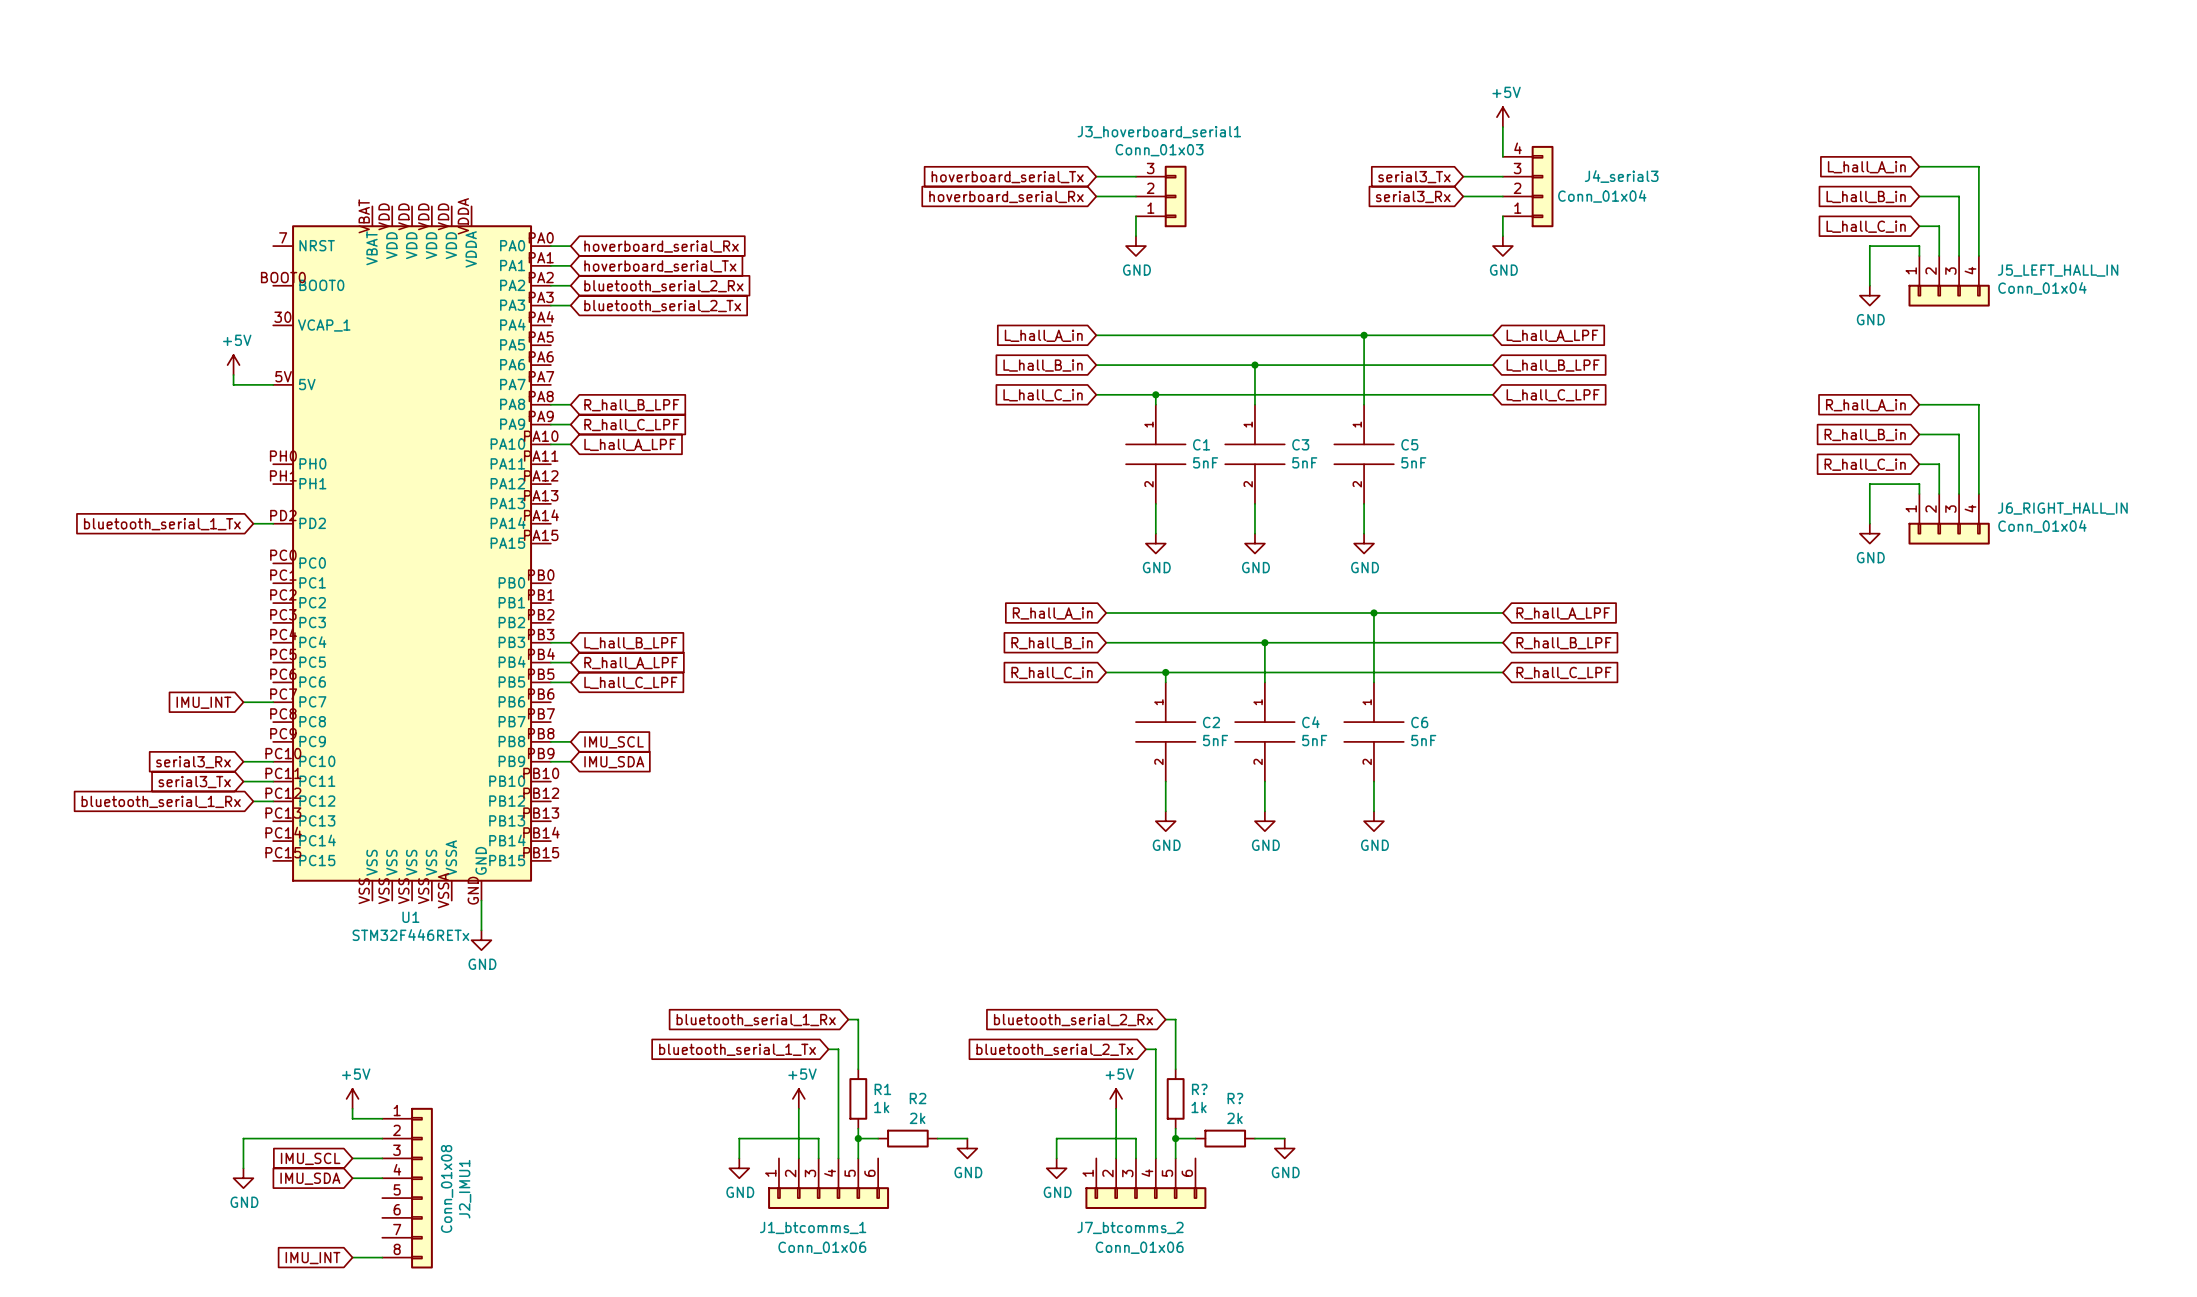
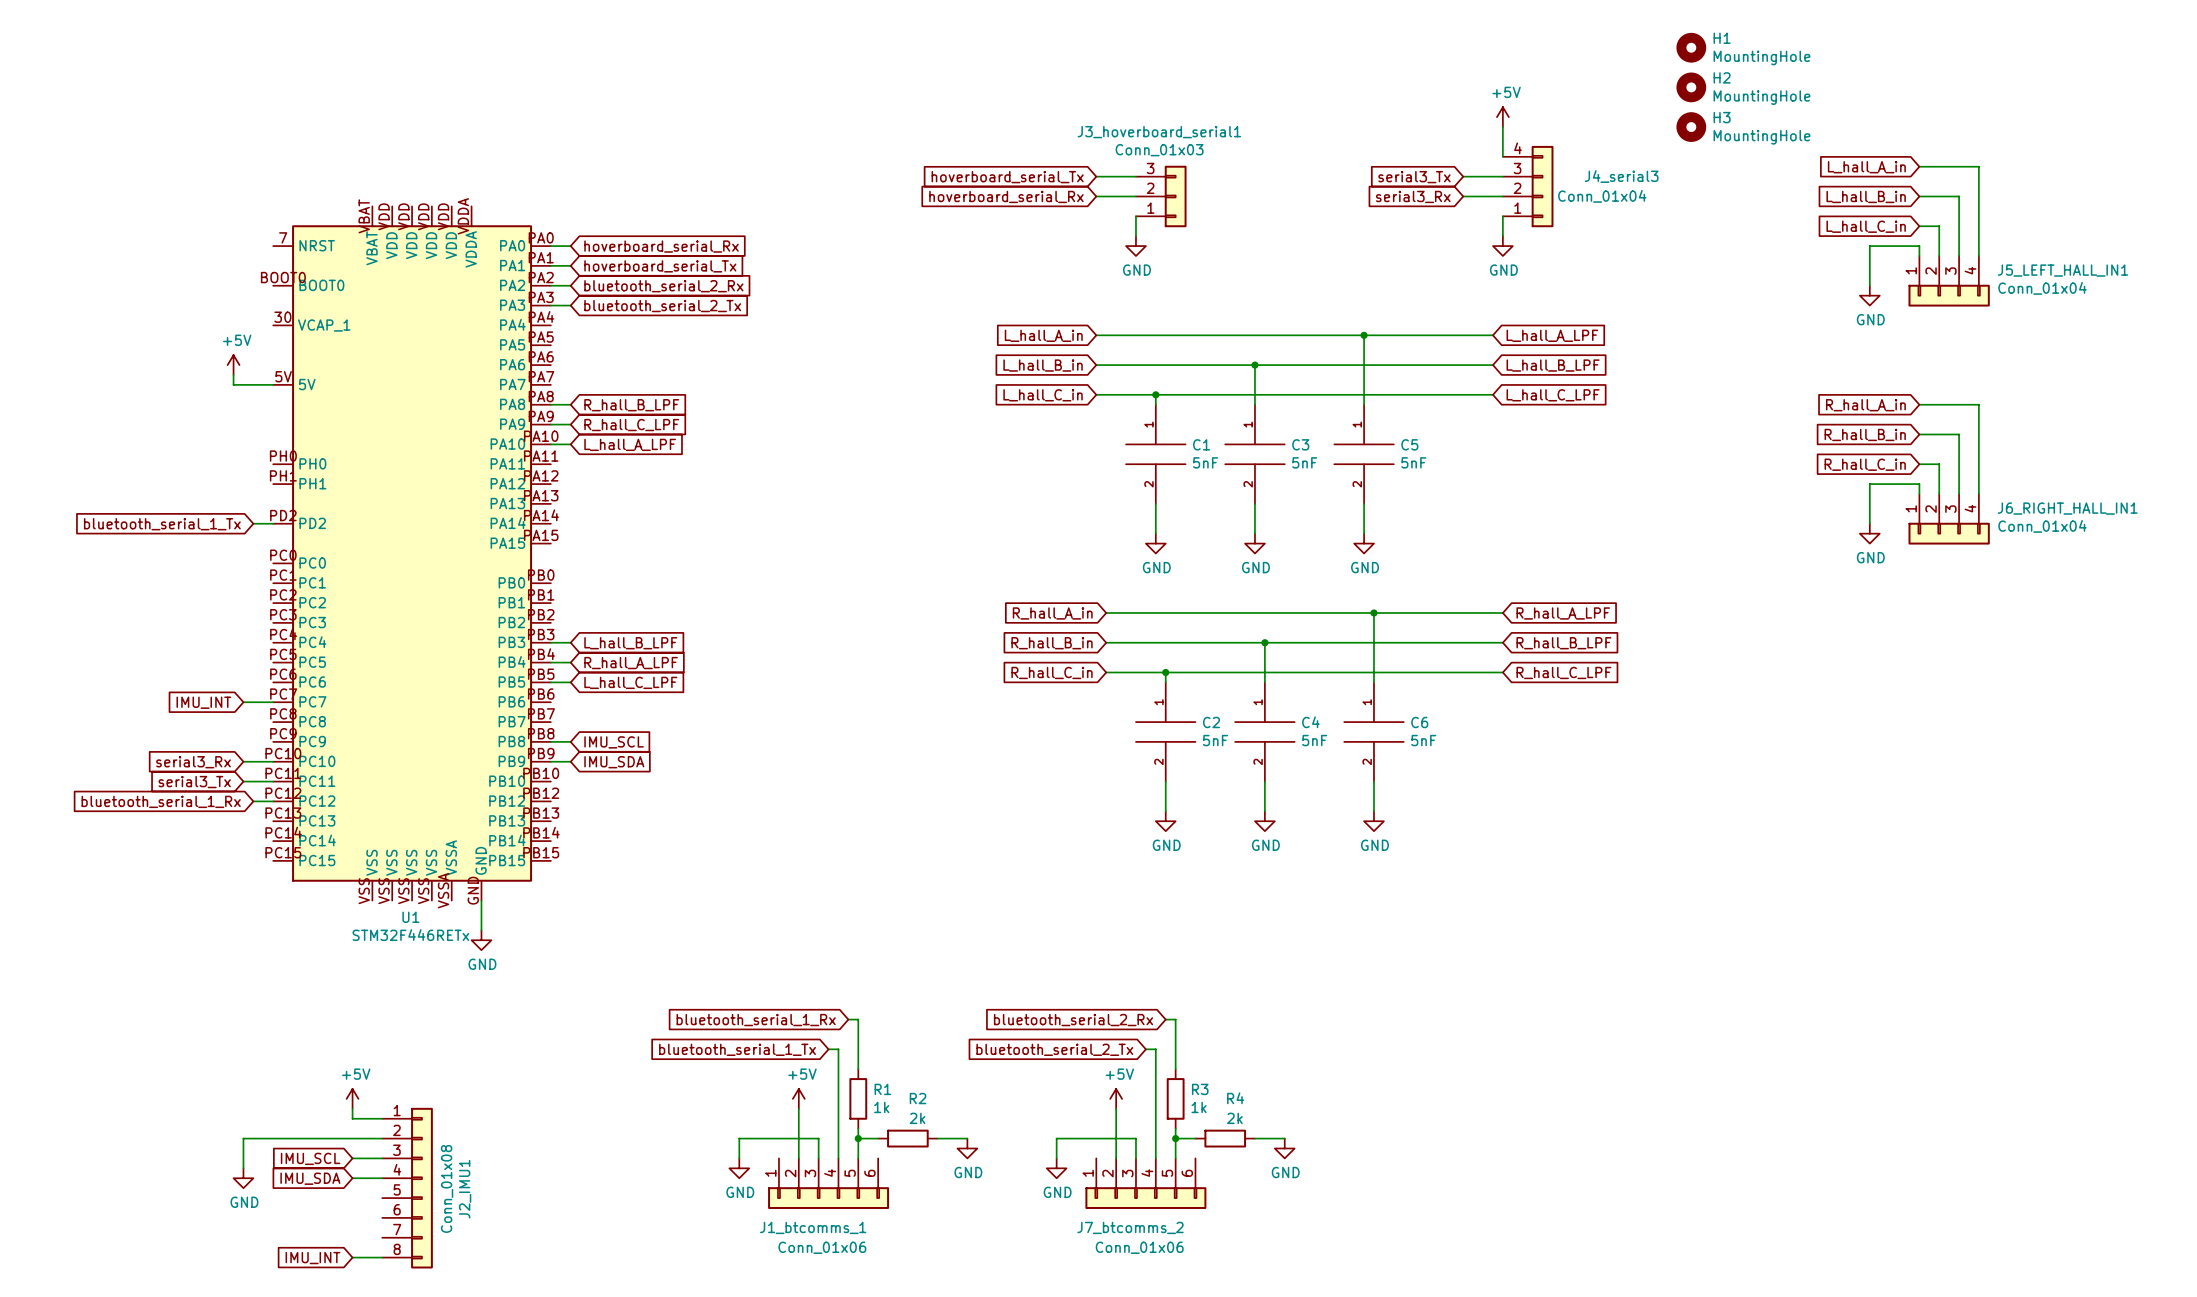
H1: none -> MountingHole (1691, 47)
H2: none -> MountingHole (1691, 87)
H3: none -> MountingHole (1691, 127)
J5_LEFT_HALL_IN name: J5_LEFT_HALL_IN (2058, 270) -> J5_LEFT_HALL_IN1 (2063, 270)
J6_RIGHT_HALL_IN name: J6_RIGHT_HALL_IN (2062, 508) -> J6_RIGHT_HALL_IN1 (2067, 508)
R? name: R? (1199, 1089) -> R3 (1200, 1089)
R? name: R? (1235, 1098) -> R4 (1235, 1098)

